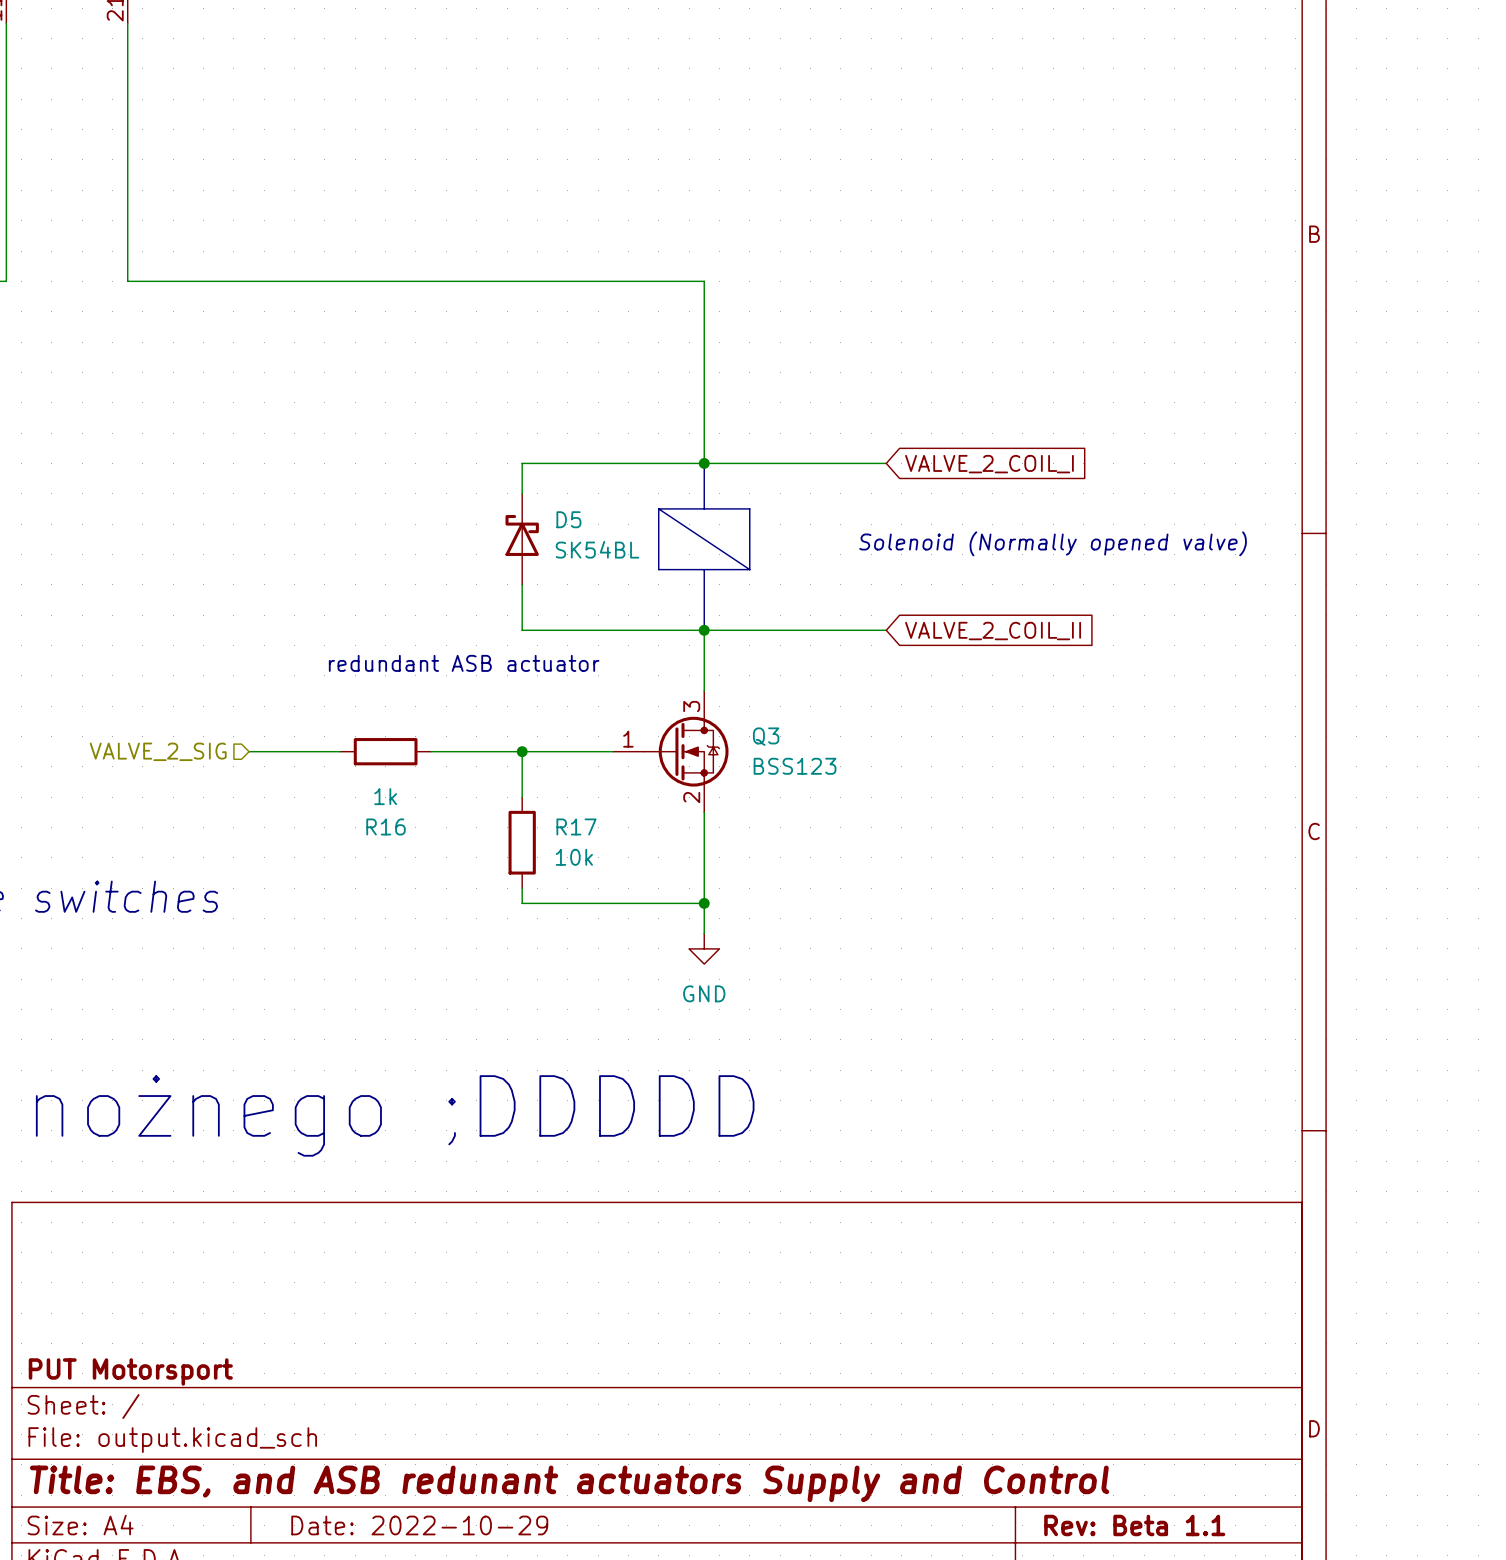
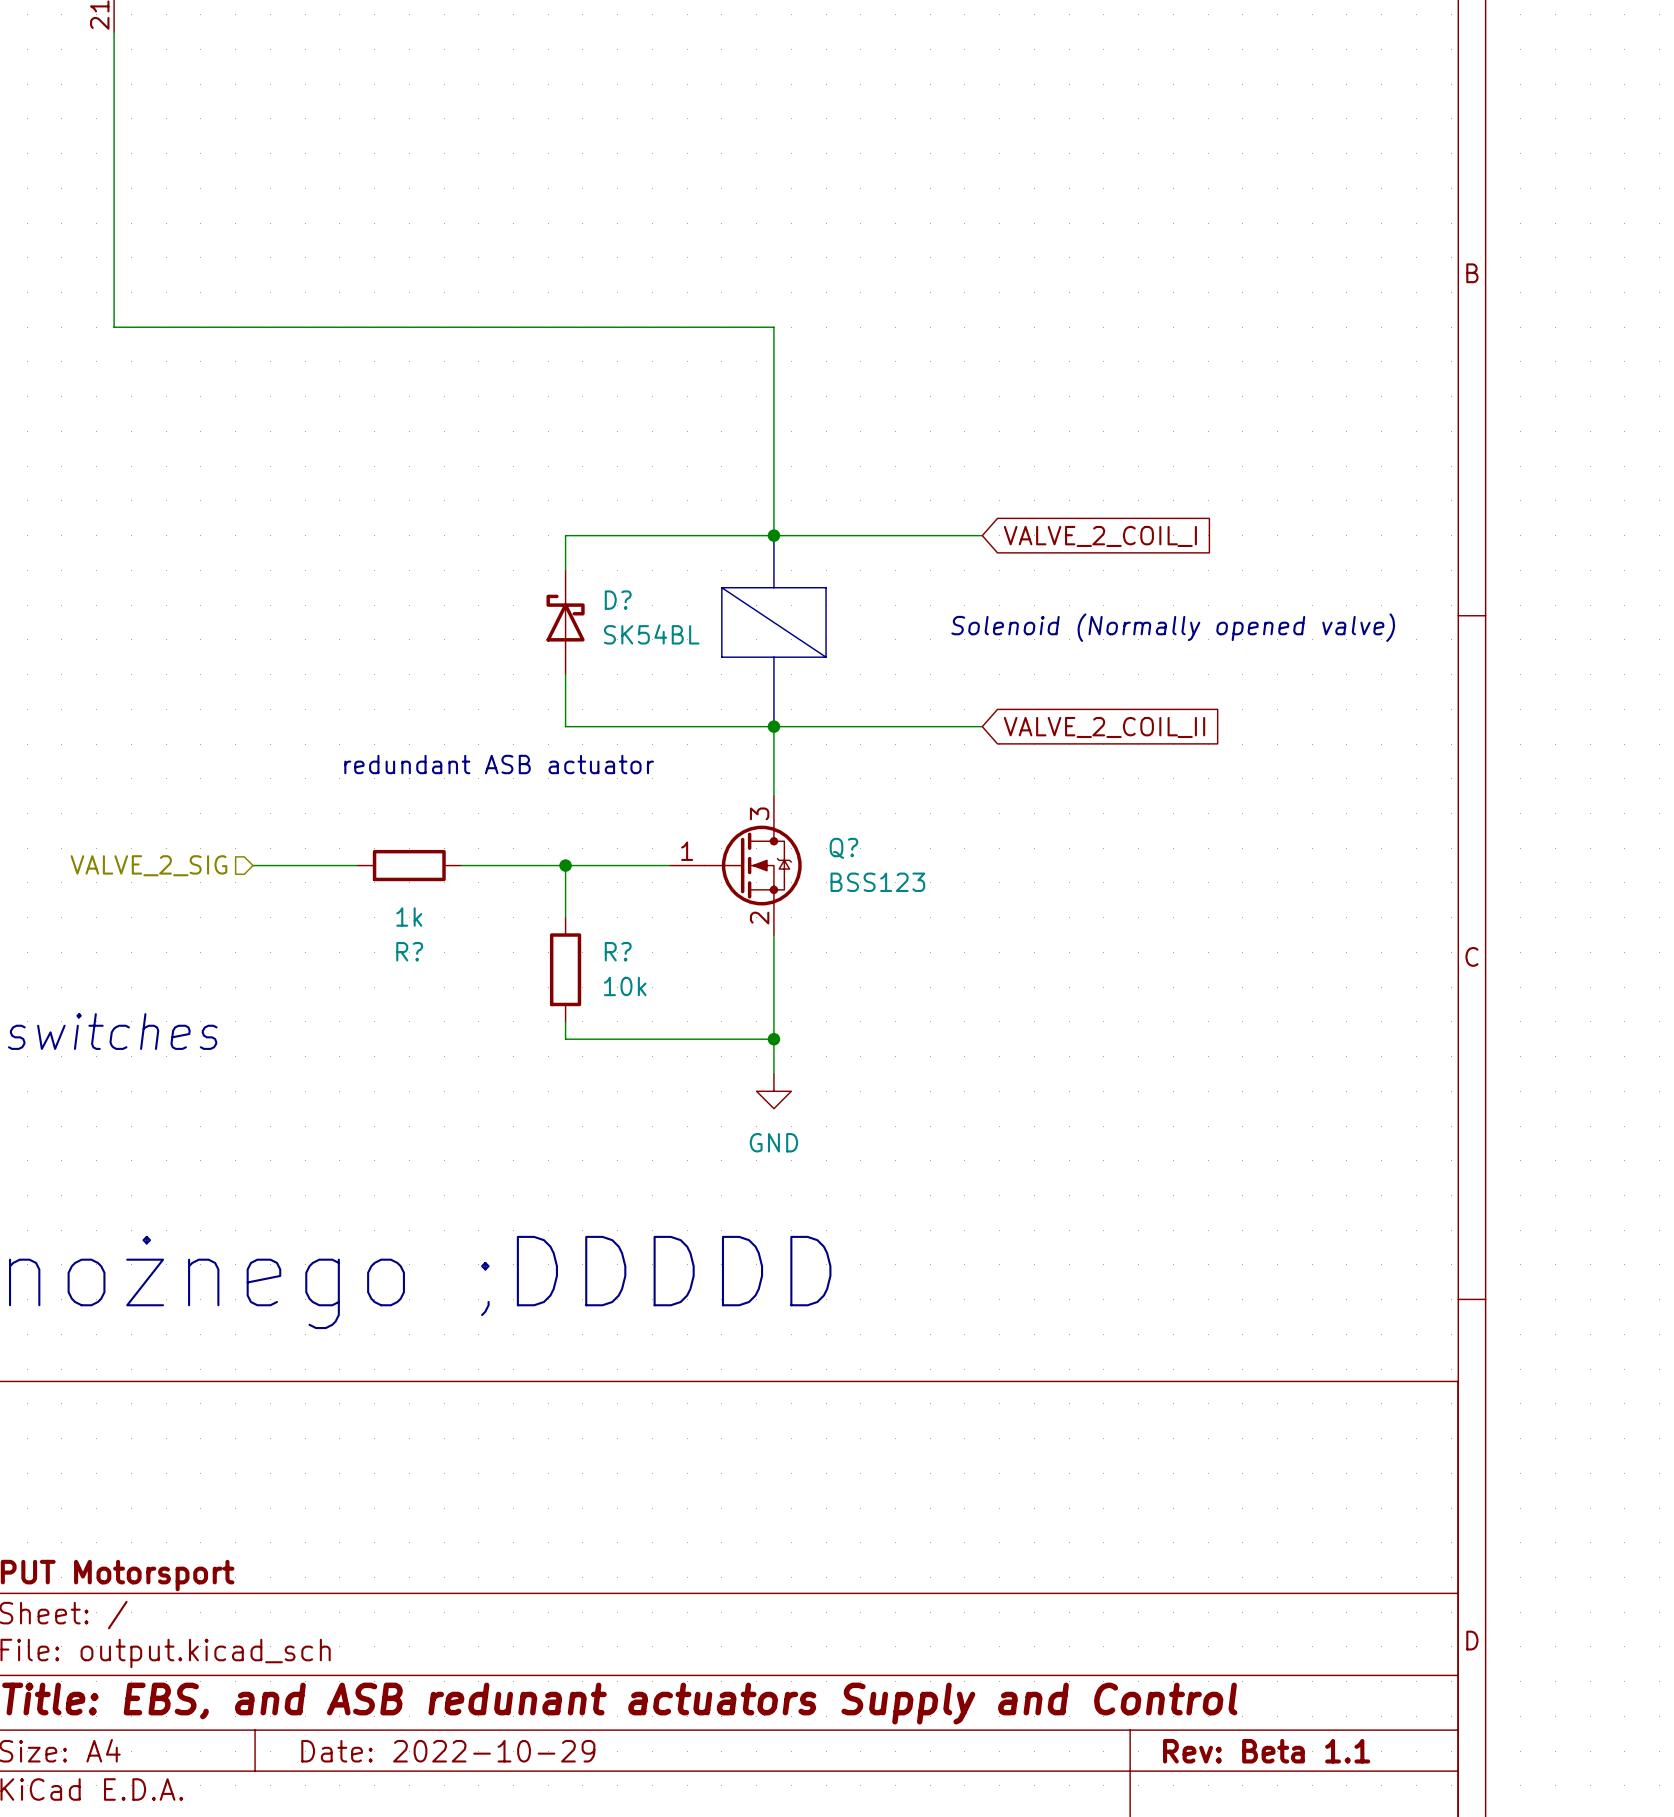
D5 name: D5 (568, 519) -> D? (618, 600)
Q3 name: Q3 (766, 736) -> Q? (843, 848)
R16 name: R16 (386, 826) -> R? (409, 951)
R17 name: R17 (576, 826) -> R? (618, 951)

